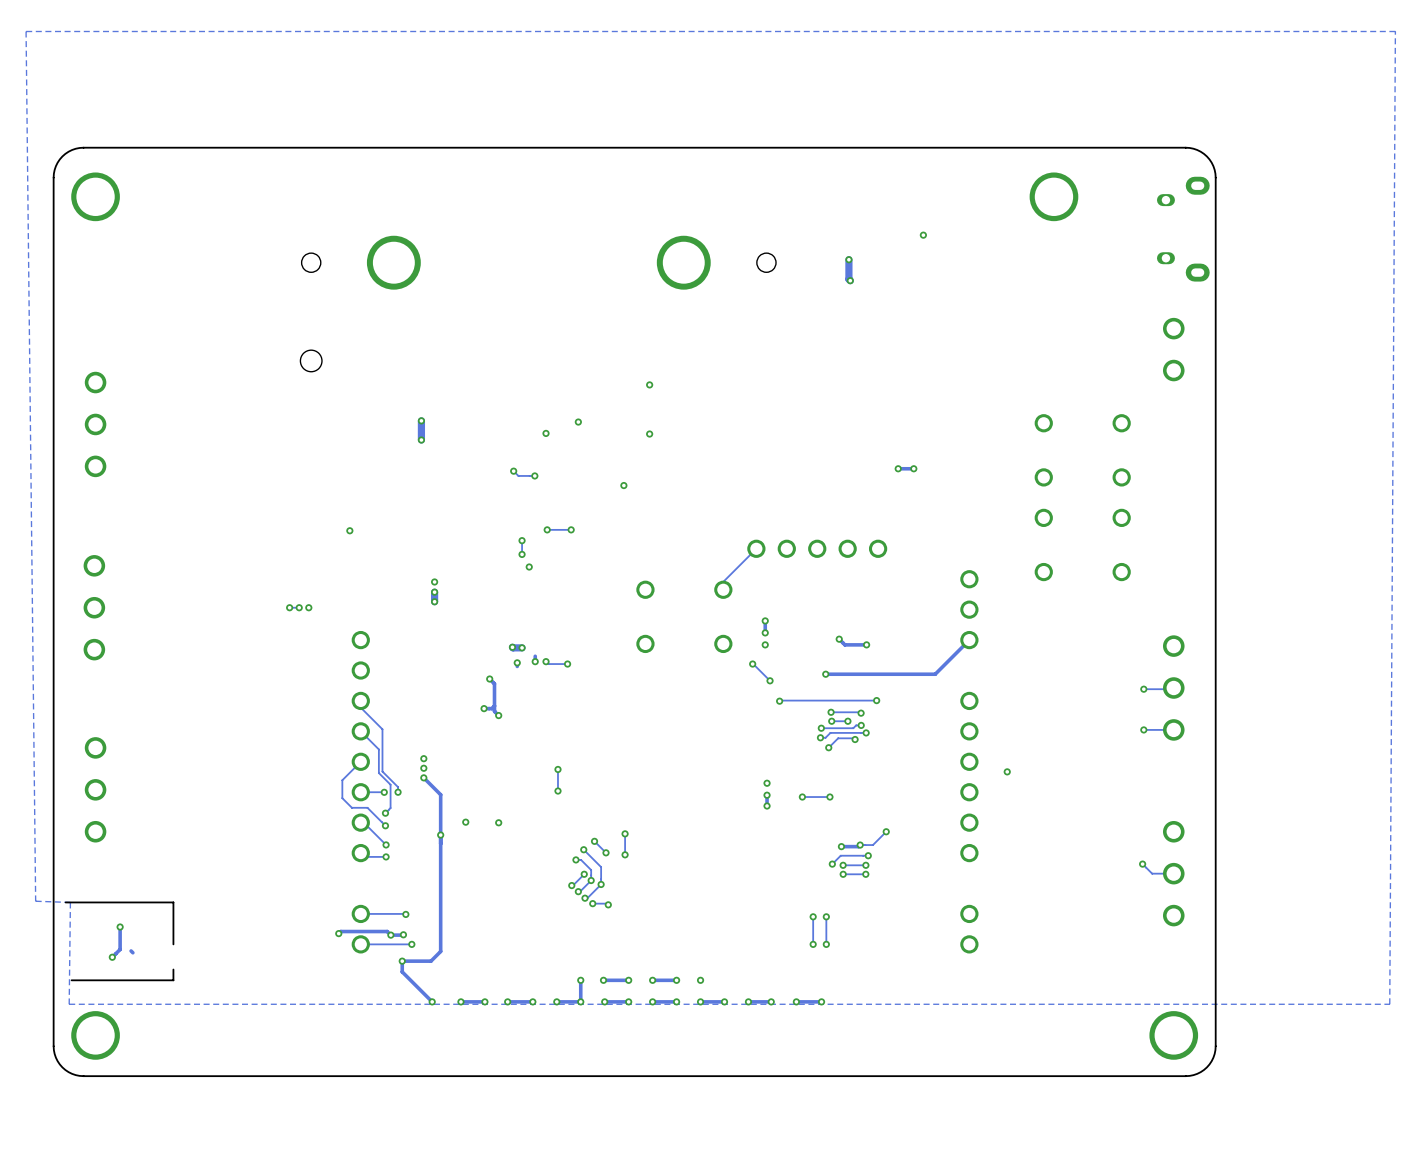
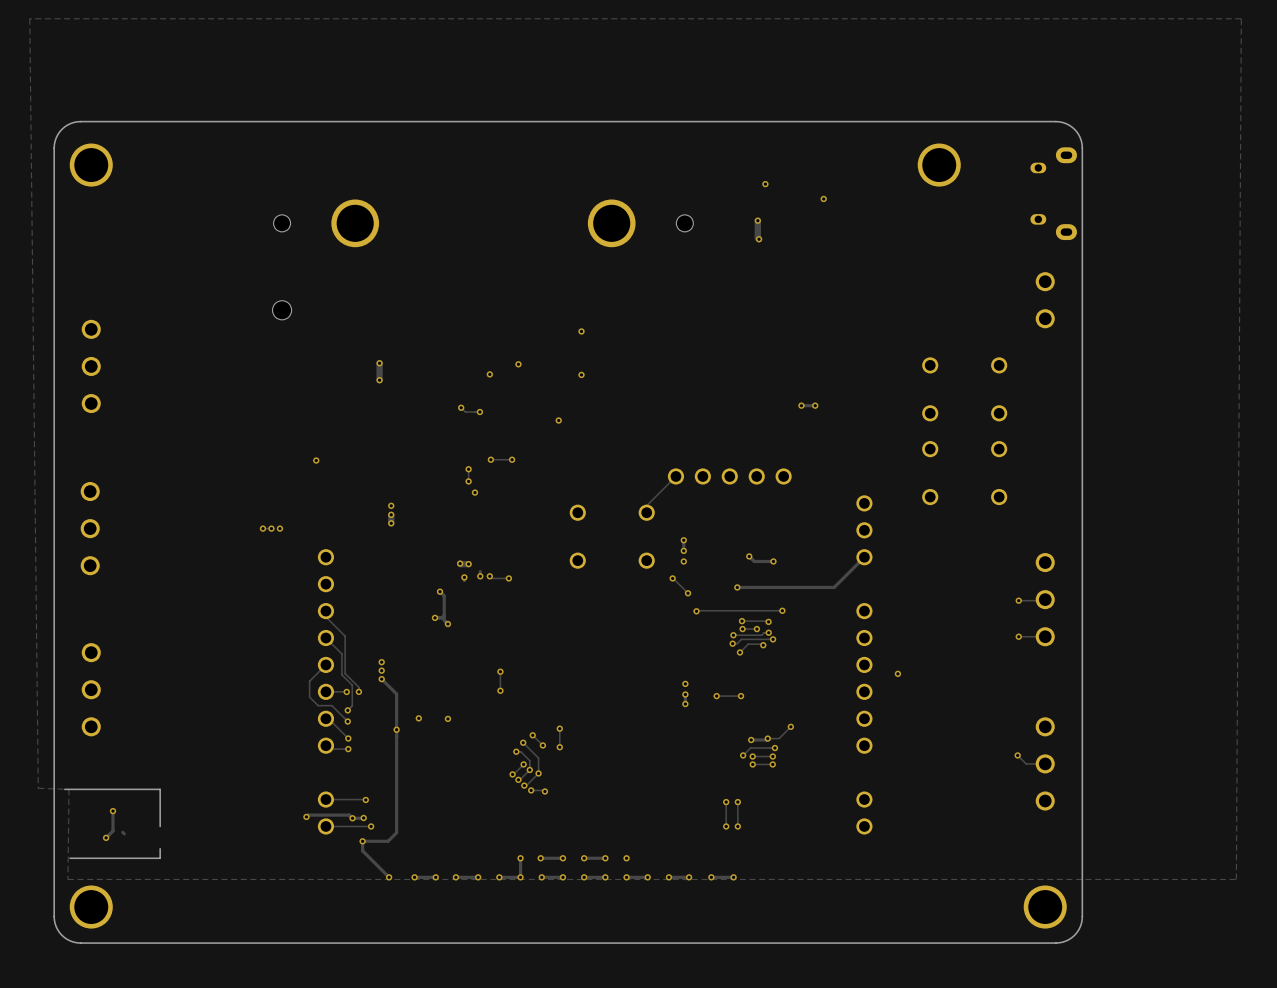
via: none -> (765, 184)

